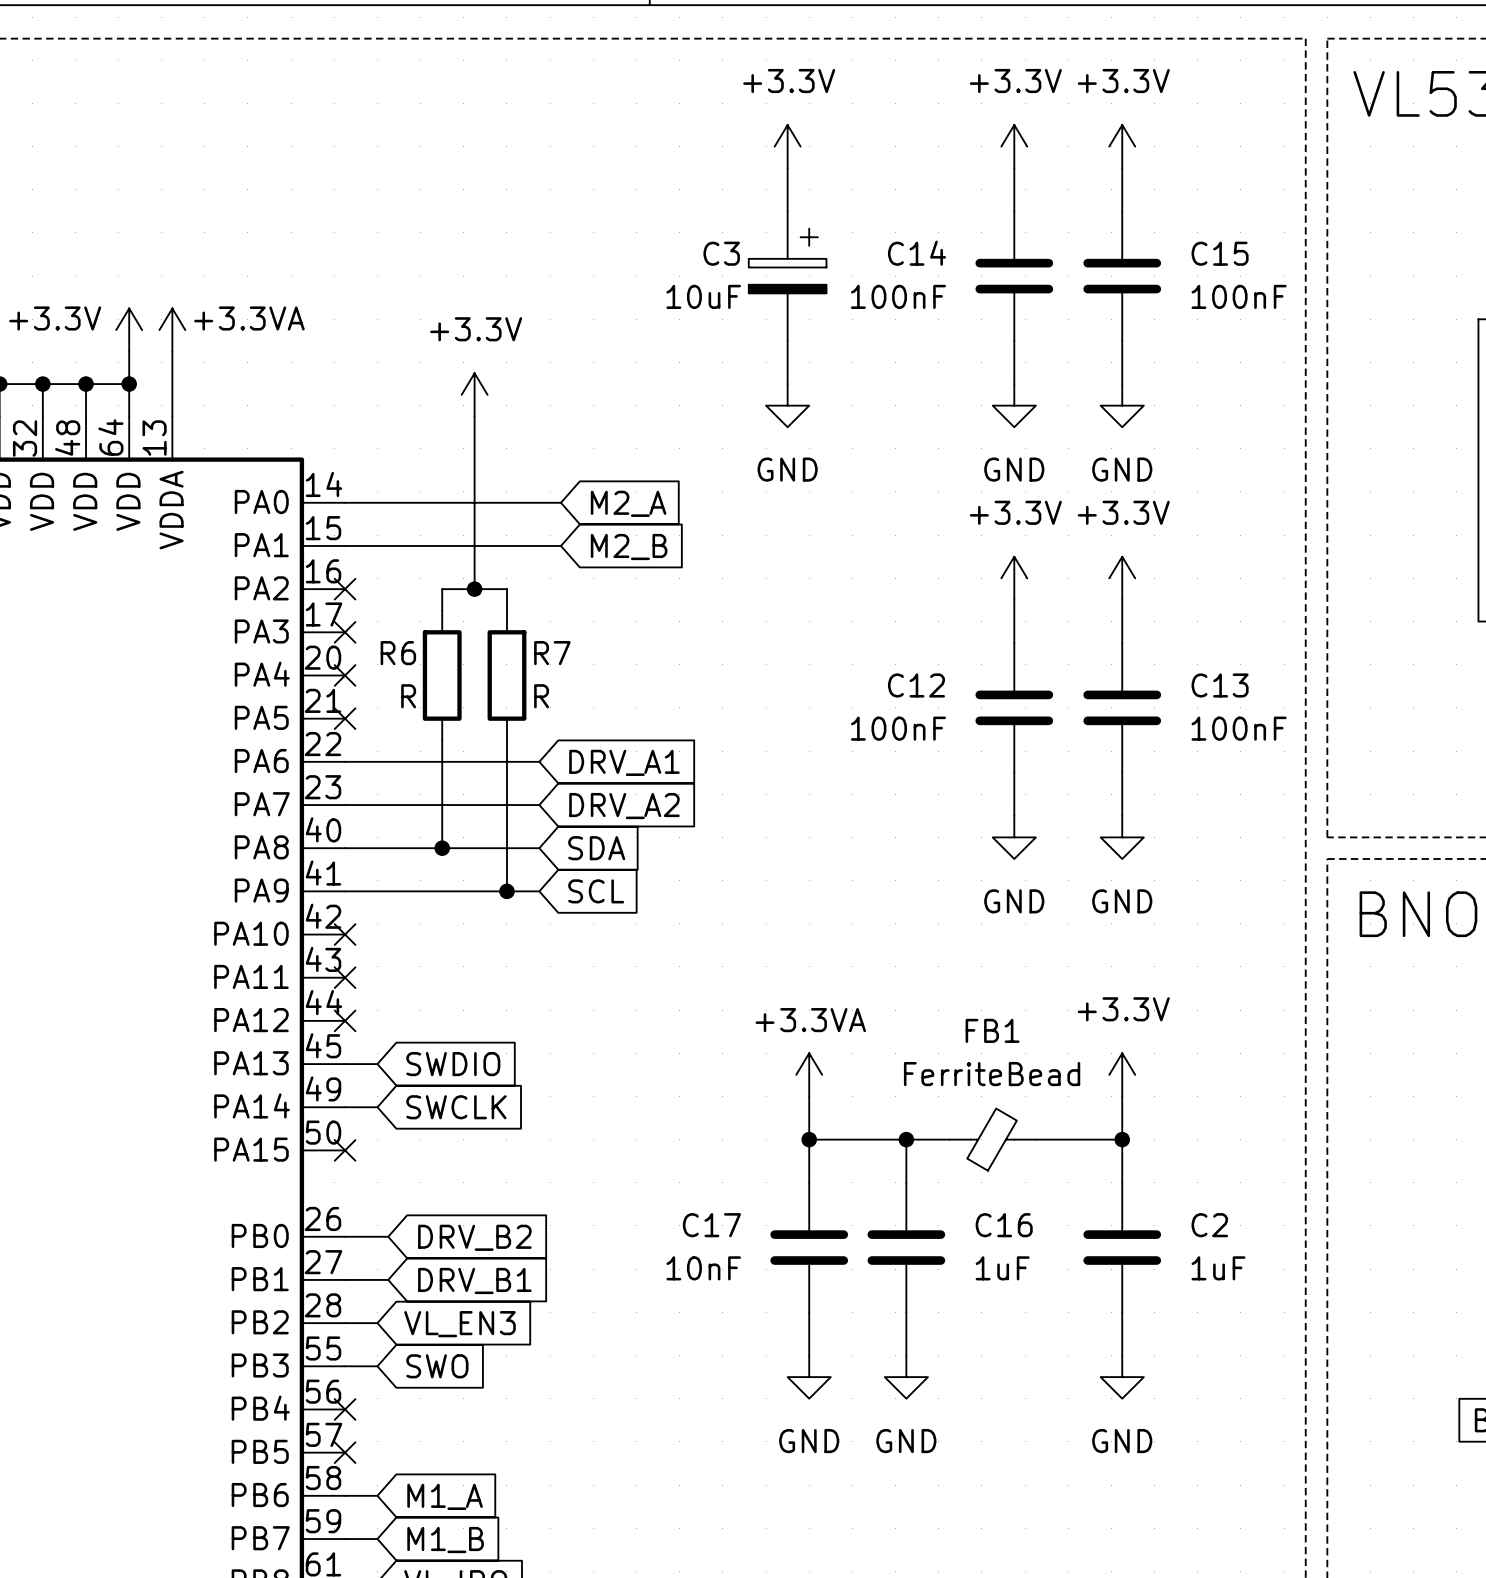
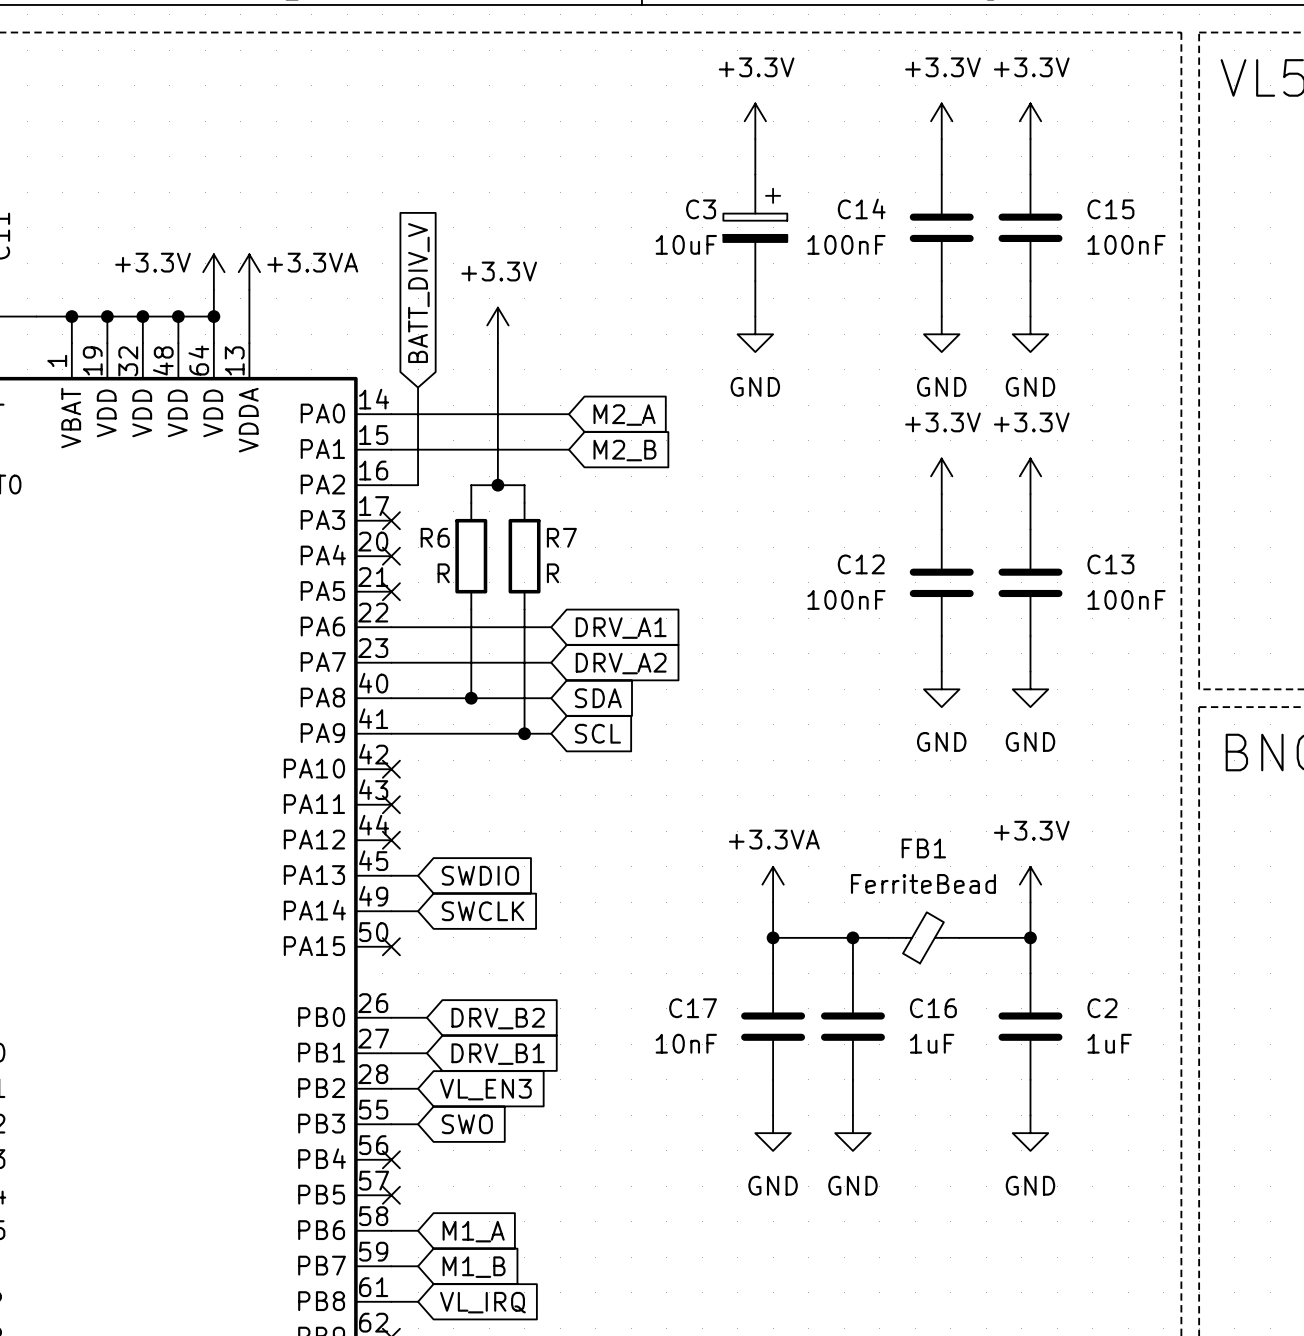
global label: none -> BATT_DIV_V (418, 293)
wire: none -> (418, 387) (418, 485) (391, 485)
no-connect mark: (345, 589) -> none

